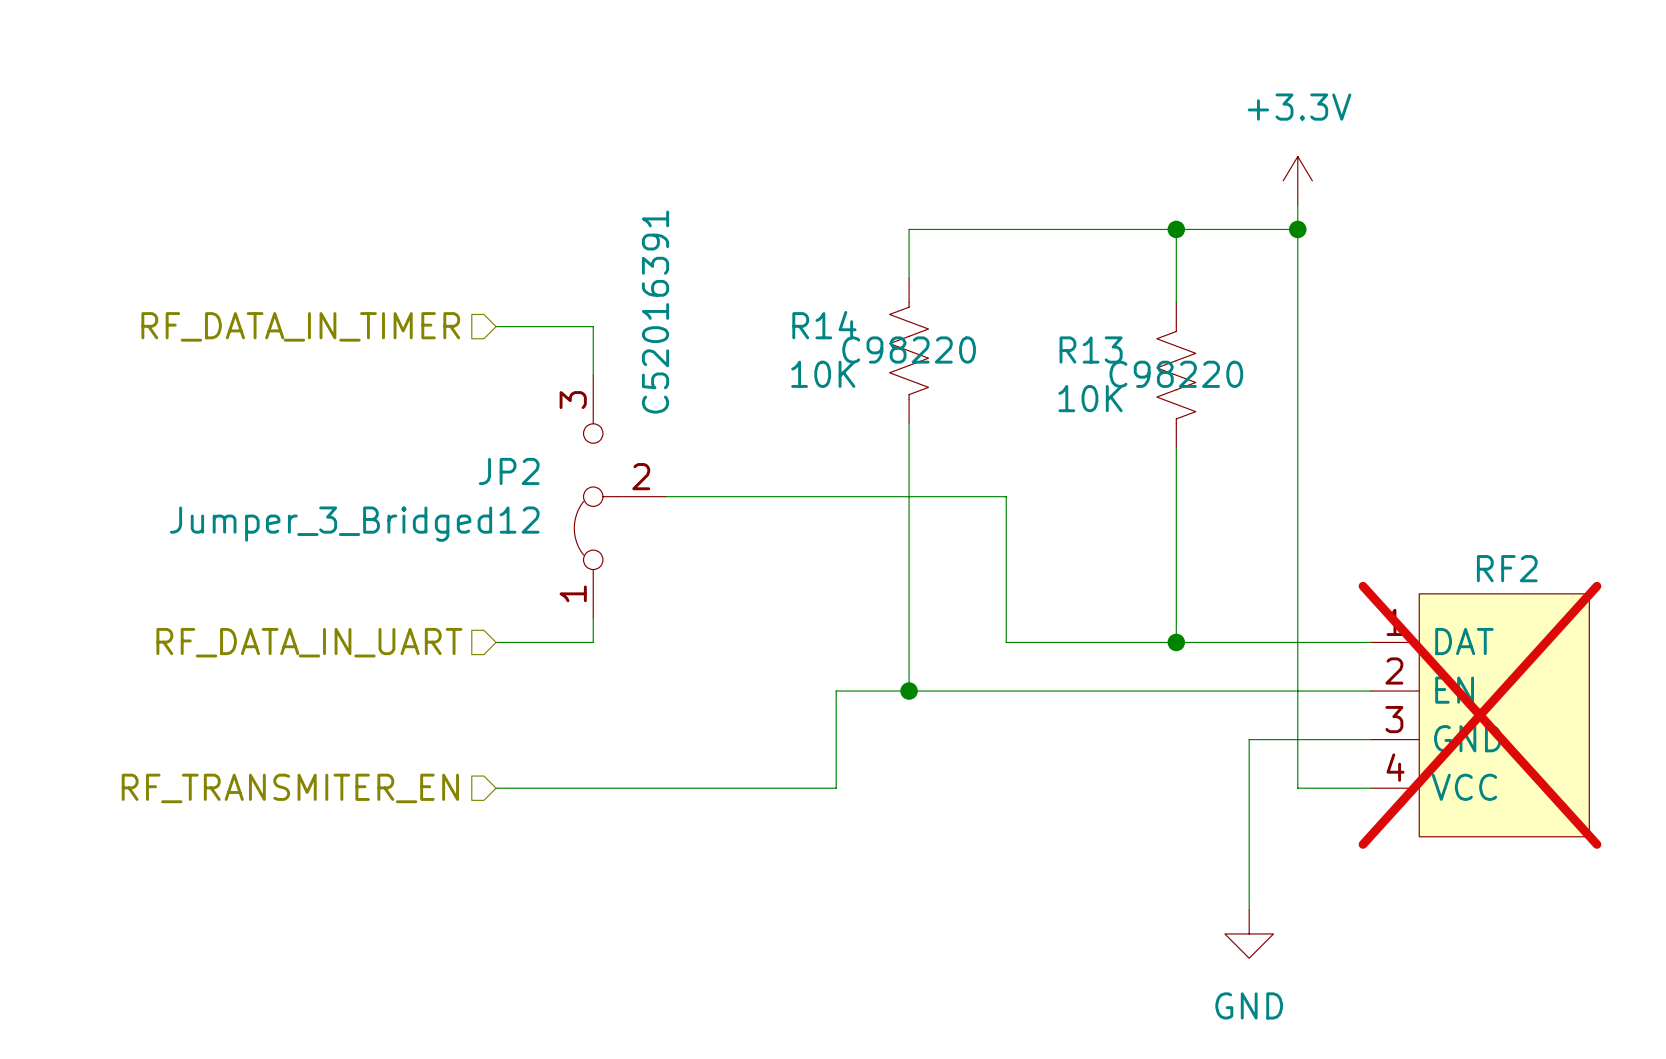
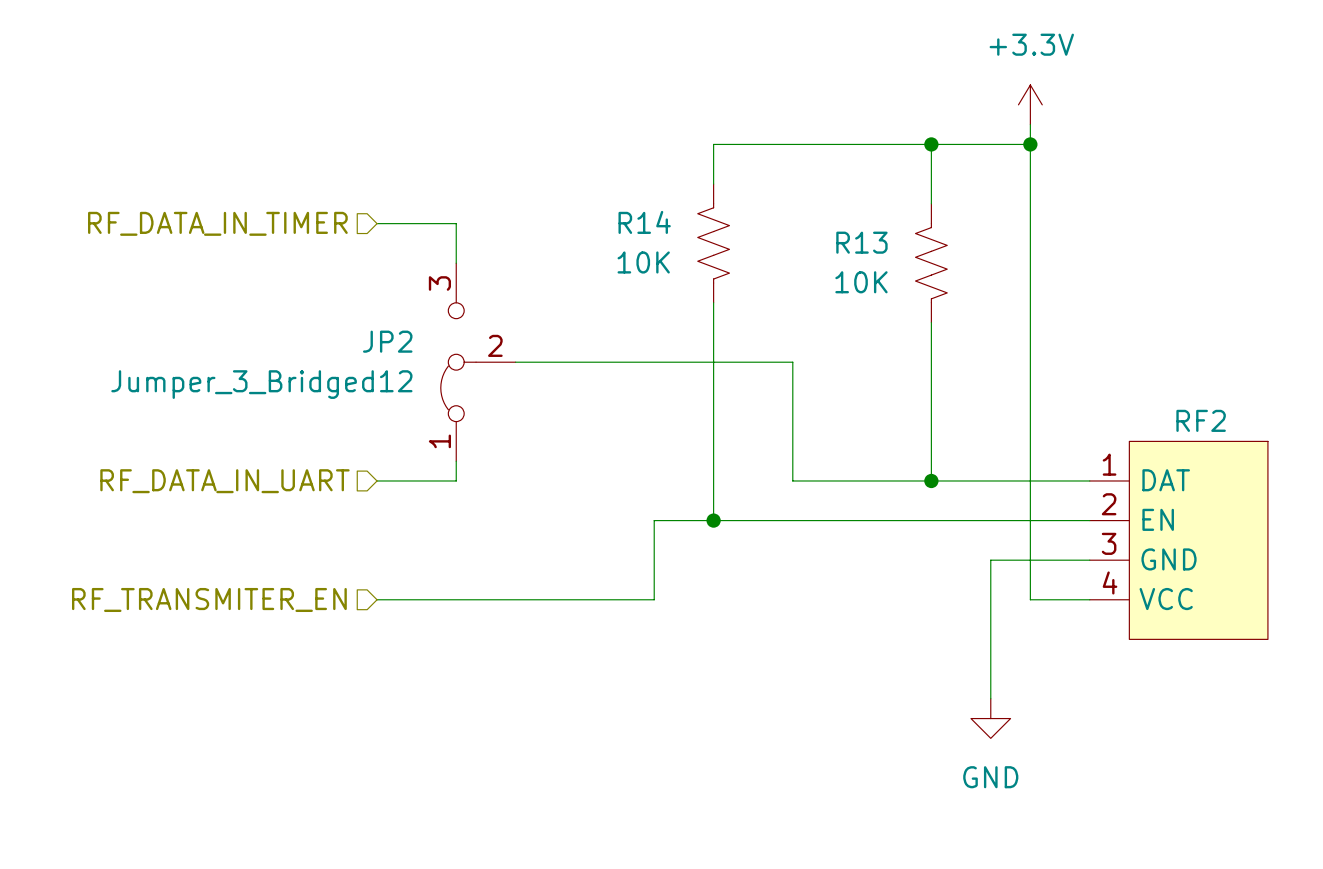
JP2 text: C52016391 (655, 312) -> none
R14 text: C98220 (909, 350) -> none
R13 text: C98220 (1176, 374) -> none
RF2 do-not-place cross: (1479, 715) -> none

